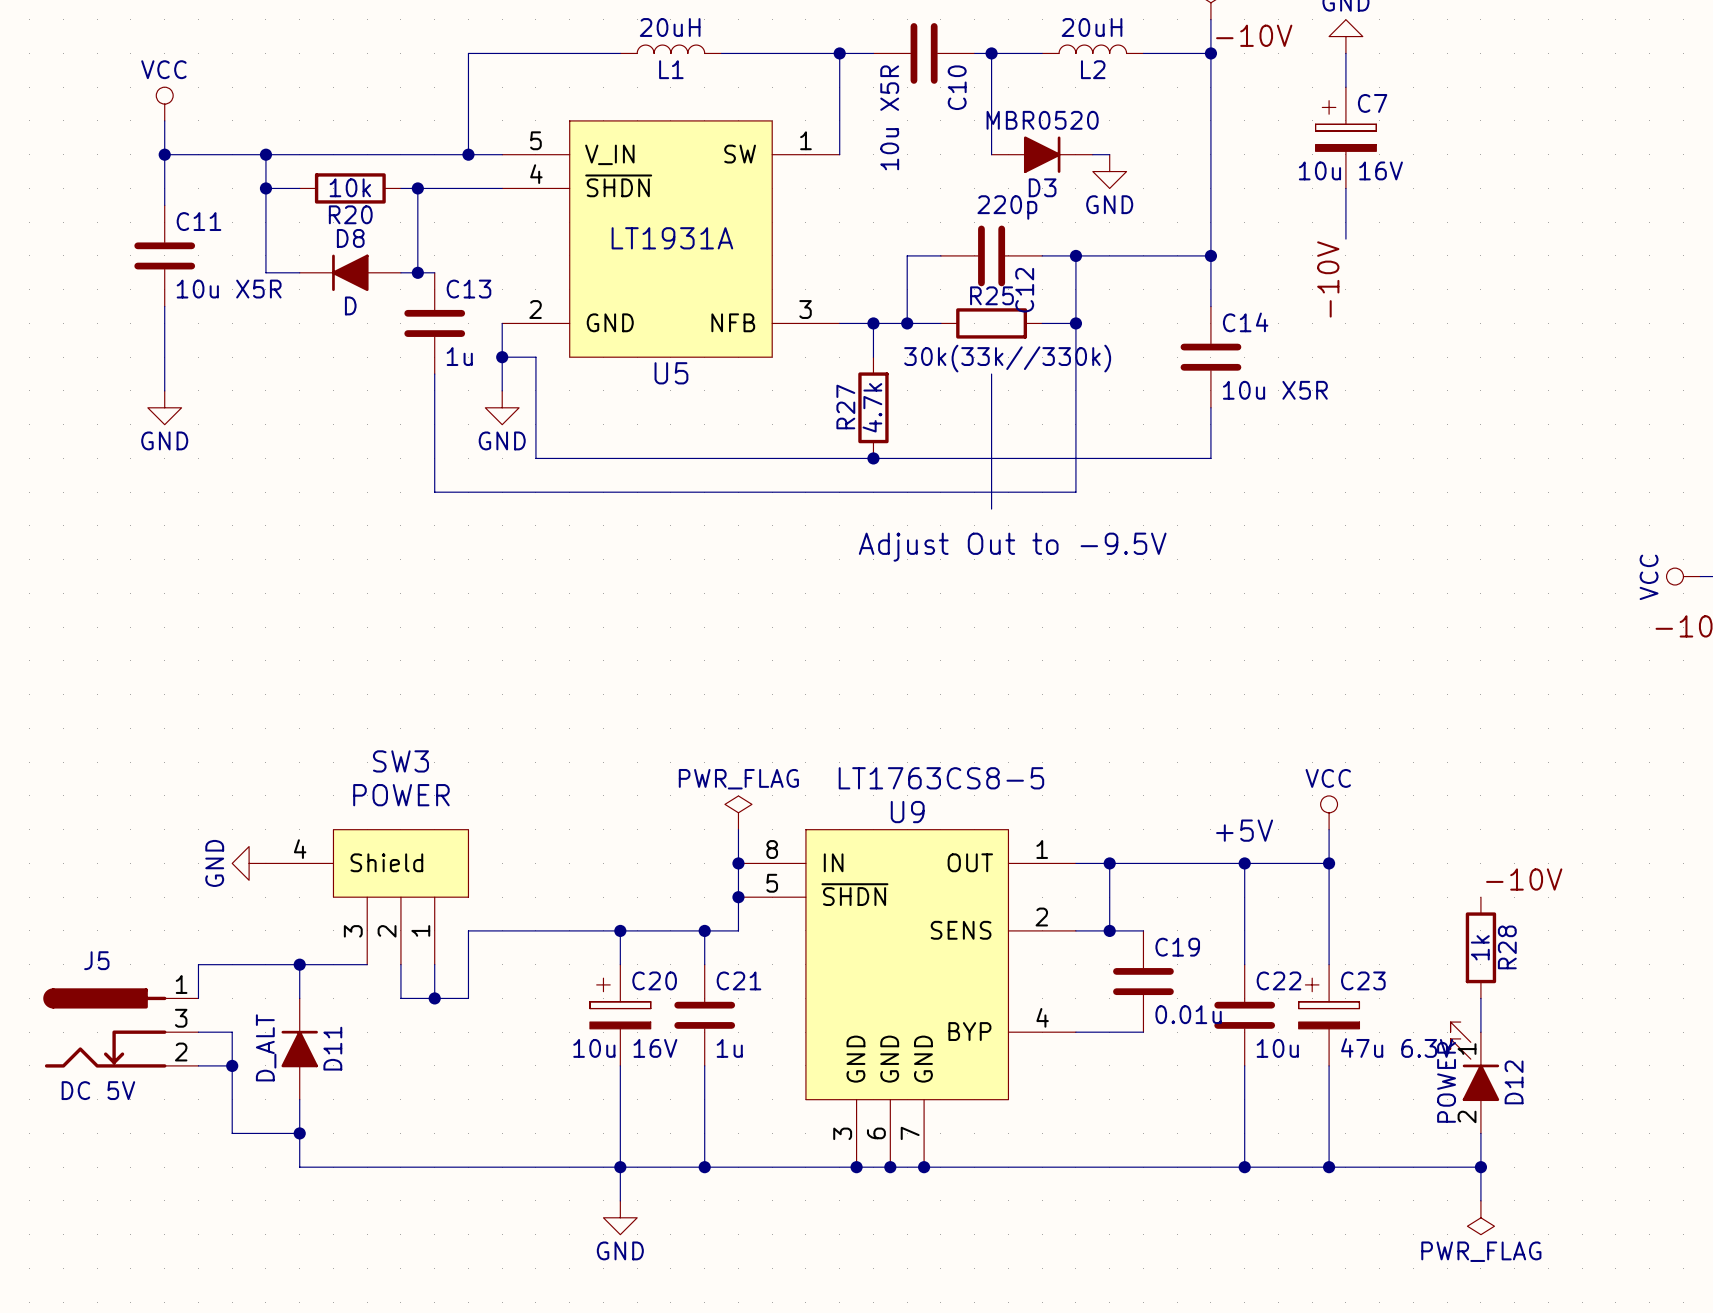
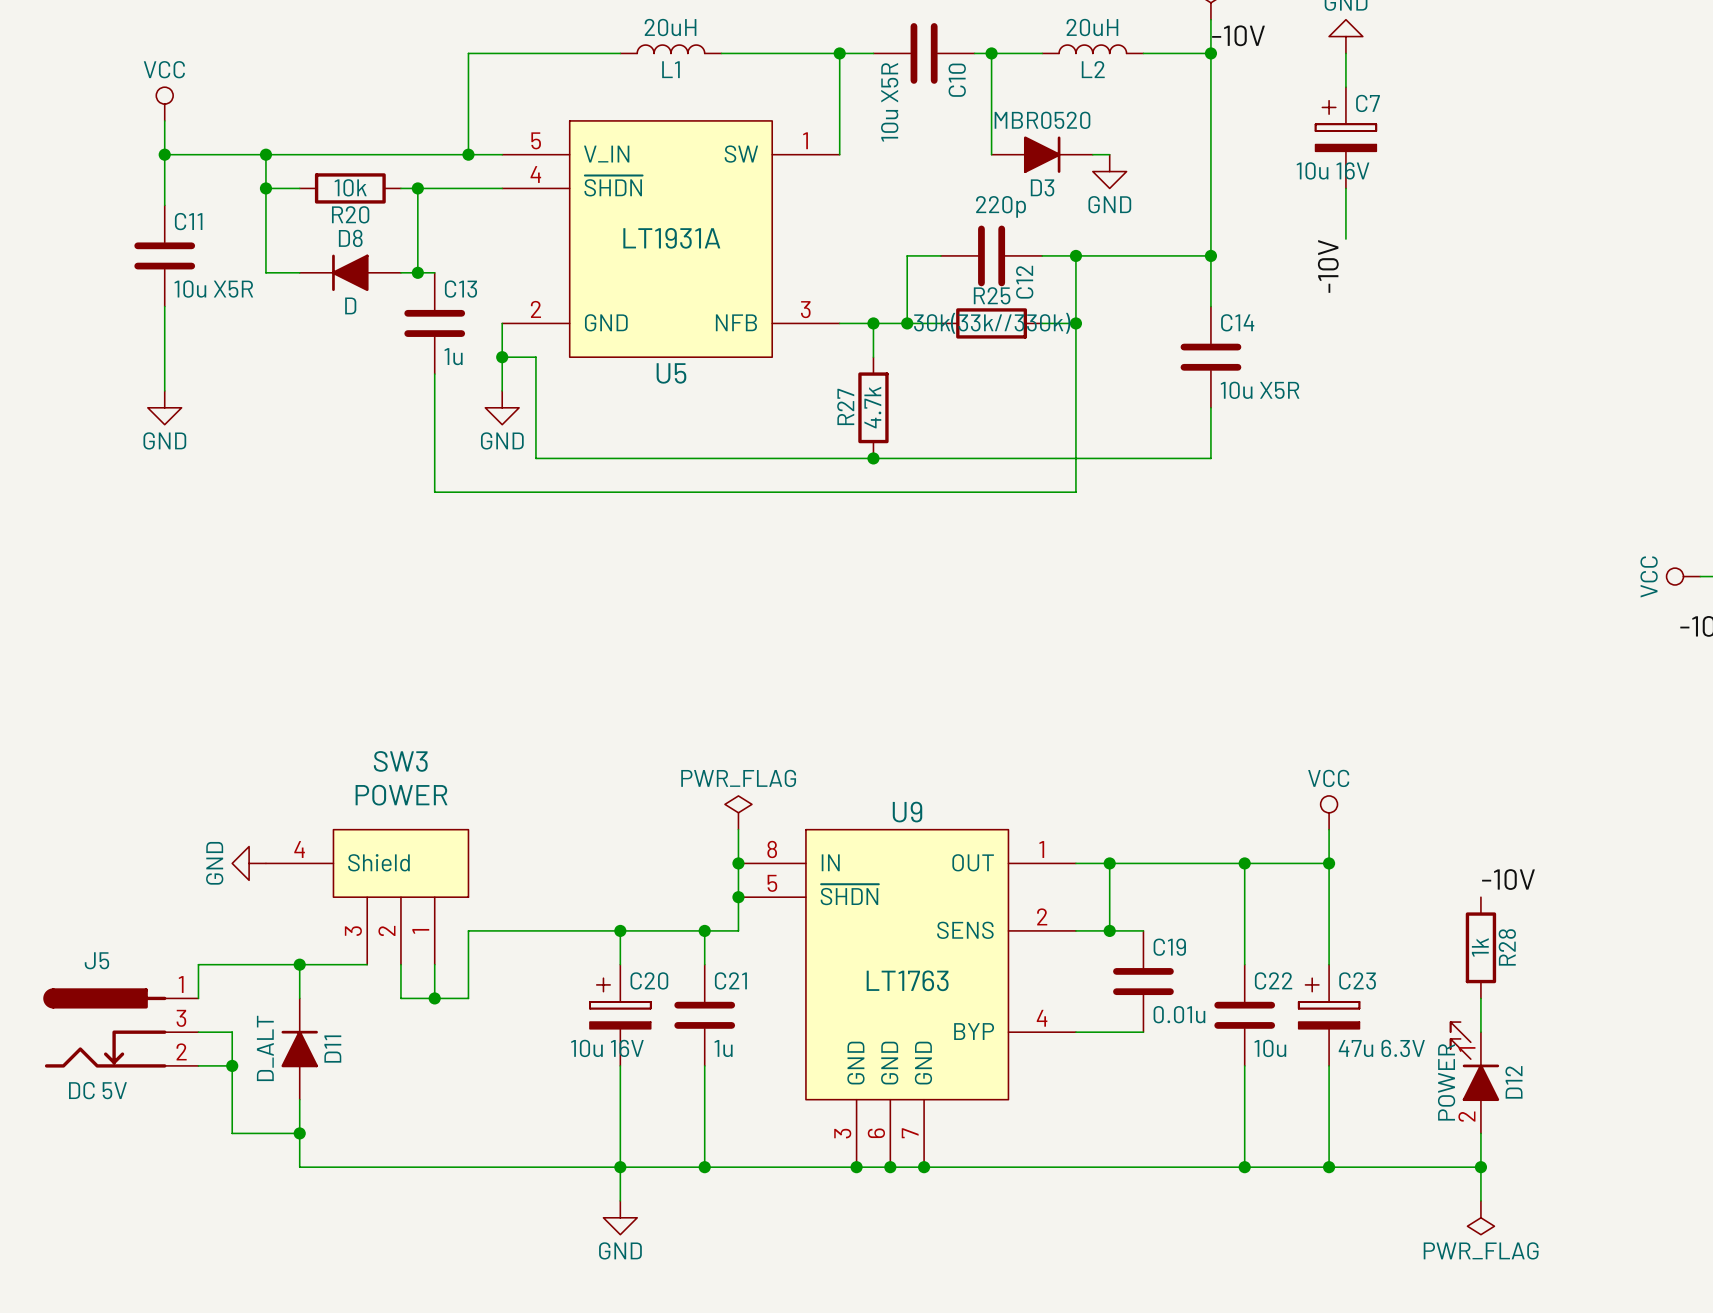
R25 value position: 30k(33k//330k) (1007, 358) -> 30k(33k//330k) (992, 323)
line: (991, 374) (991, 509) -> none
text: Adjust Out to -9.5V (1012, 547) -> none
U9 value: LT1763CS8-5 (941, 778) -> LT1763 (907, 980)
text: +5V (1244, 830) -> none

